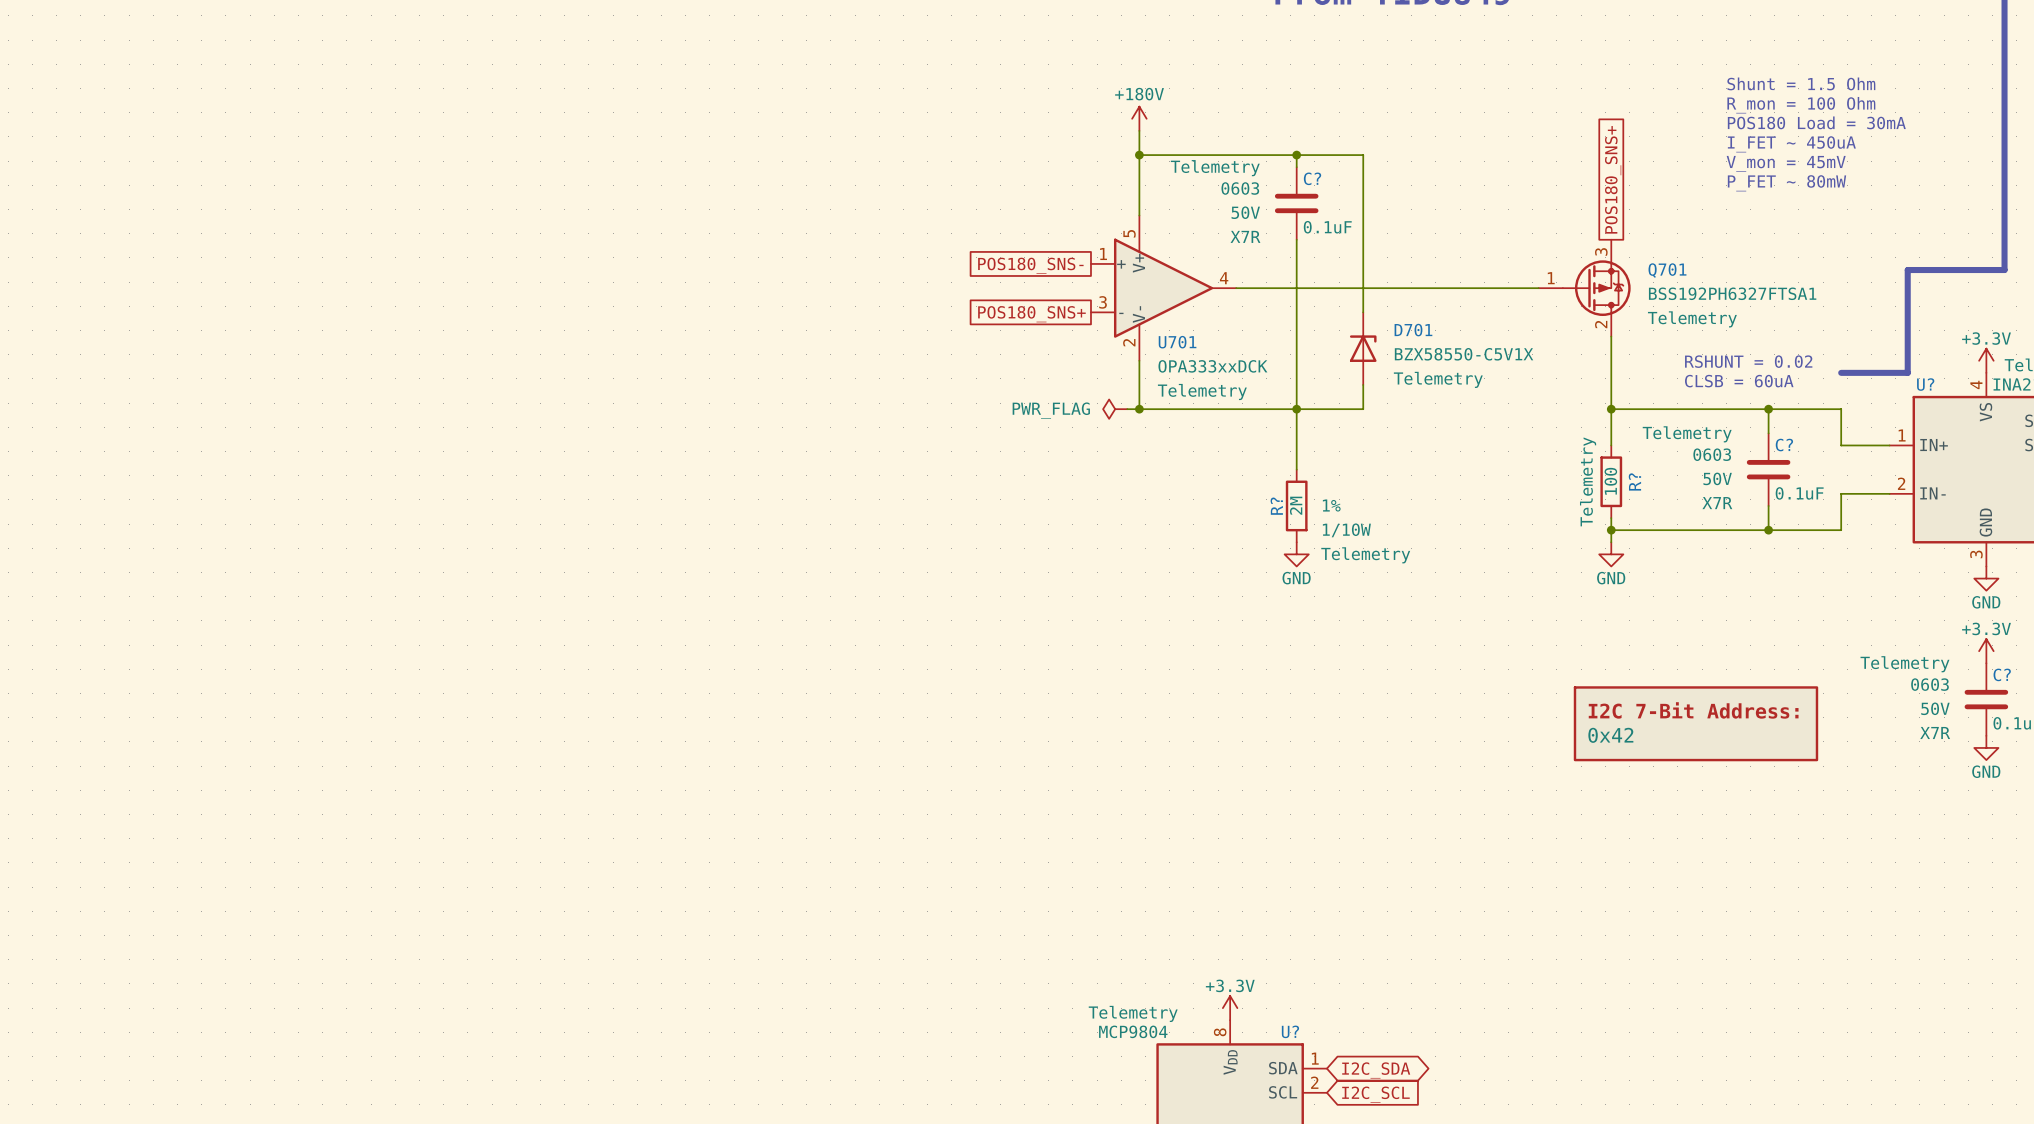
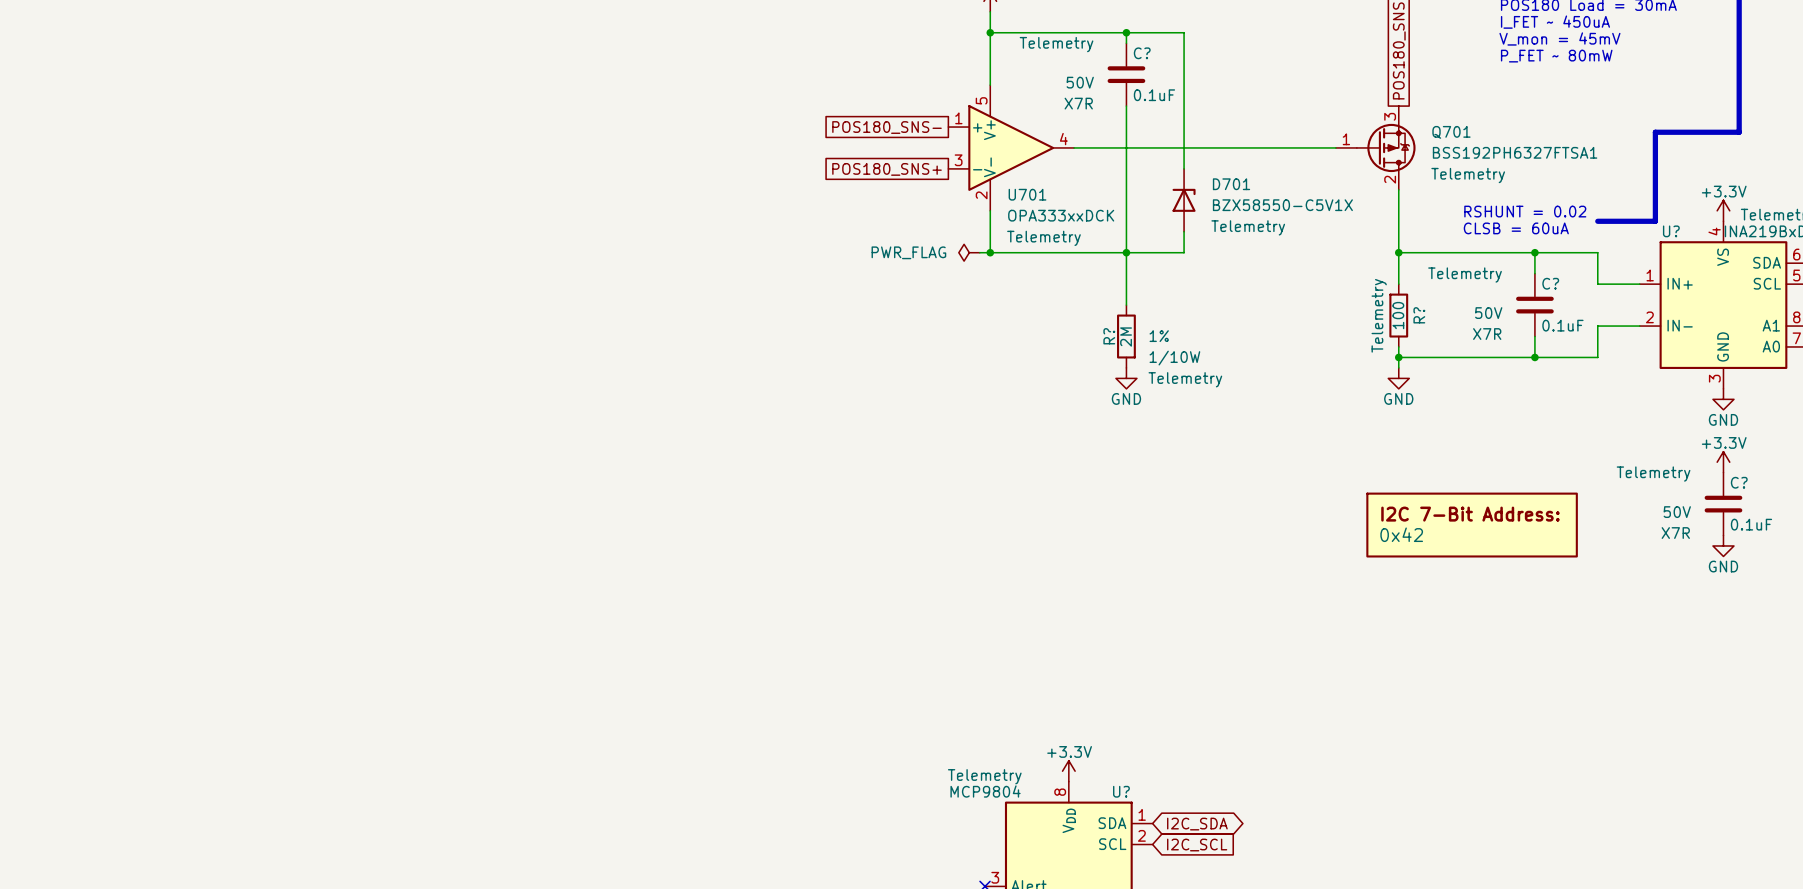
C? text: 0603 (1240, 188) -> none
C? text: 0603 (1712, 454) -> none
C? text: 0603 (1930, 684) -> none

